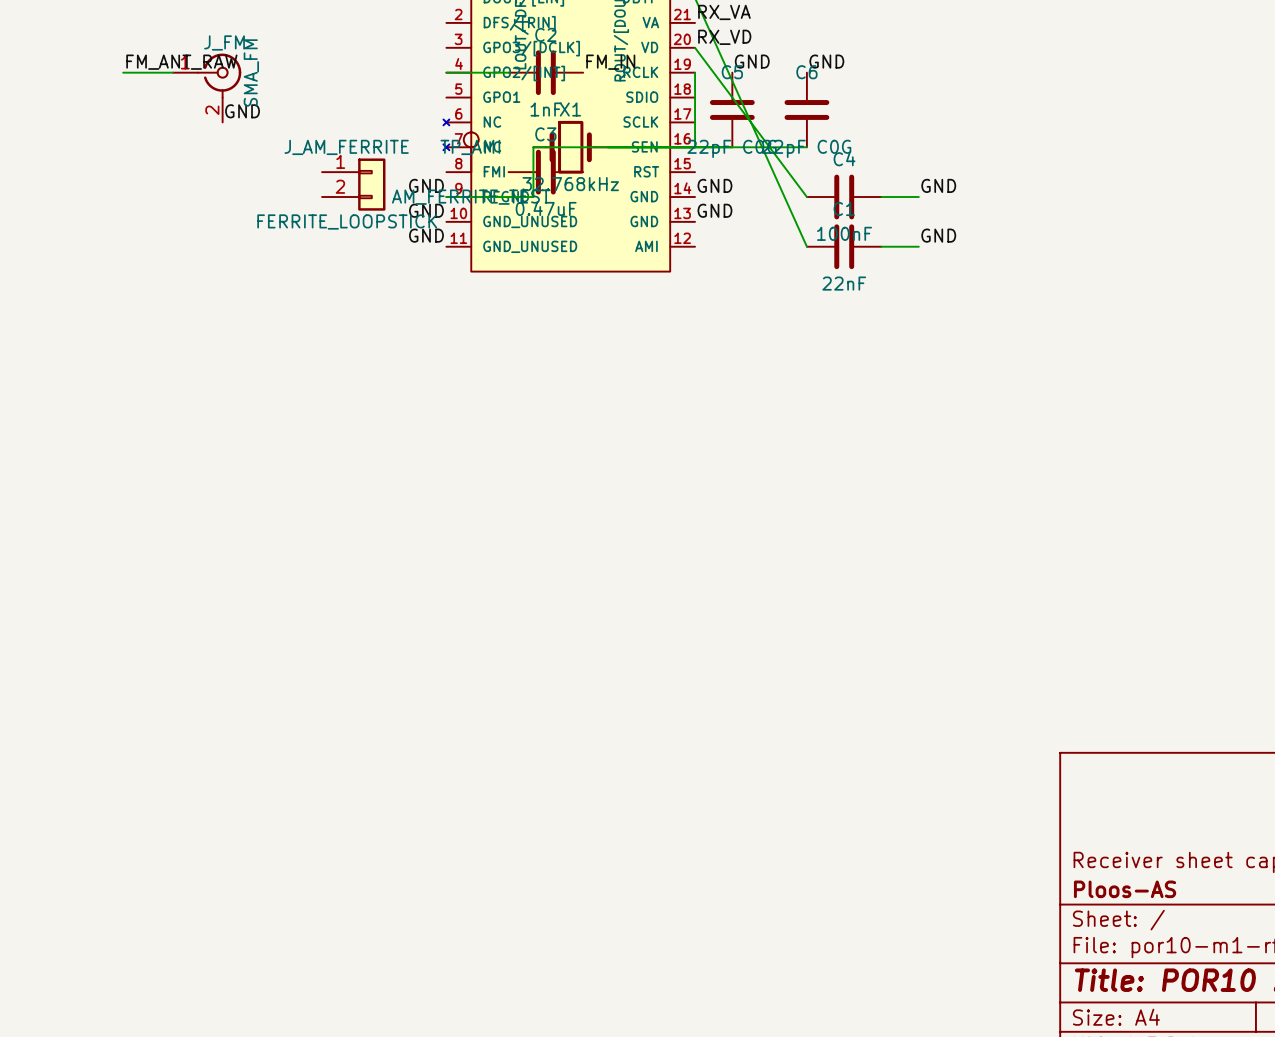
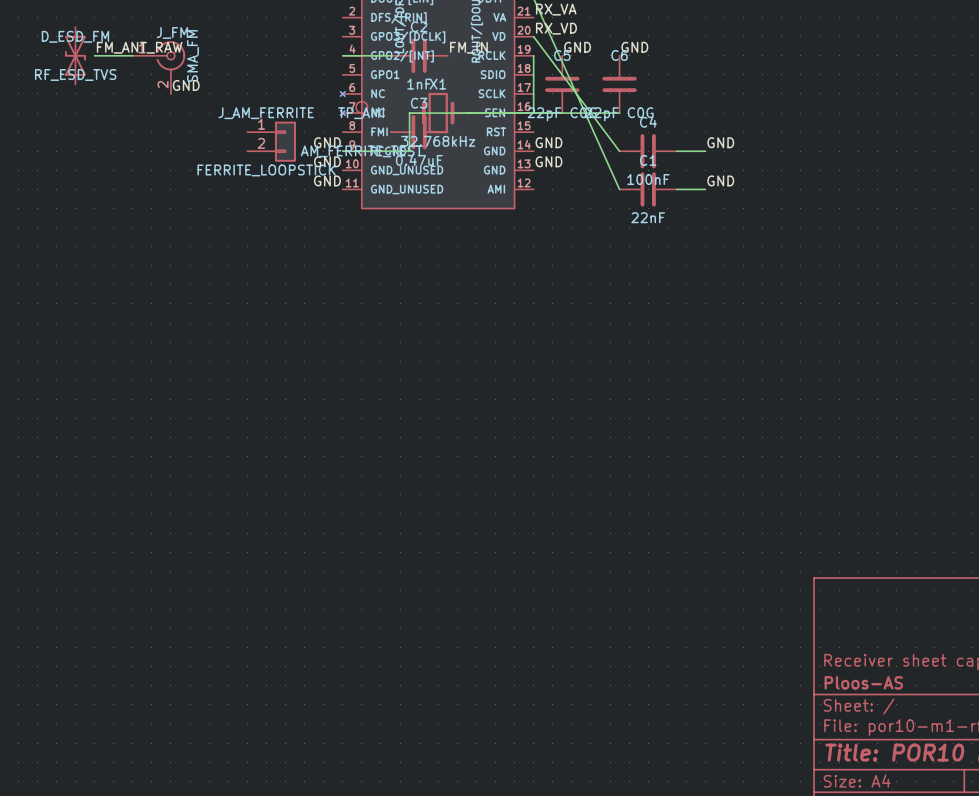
D_ESD_FM: none -> RF_ESD_TVS (75, 55)

